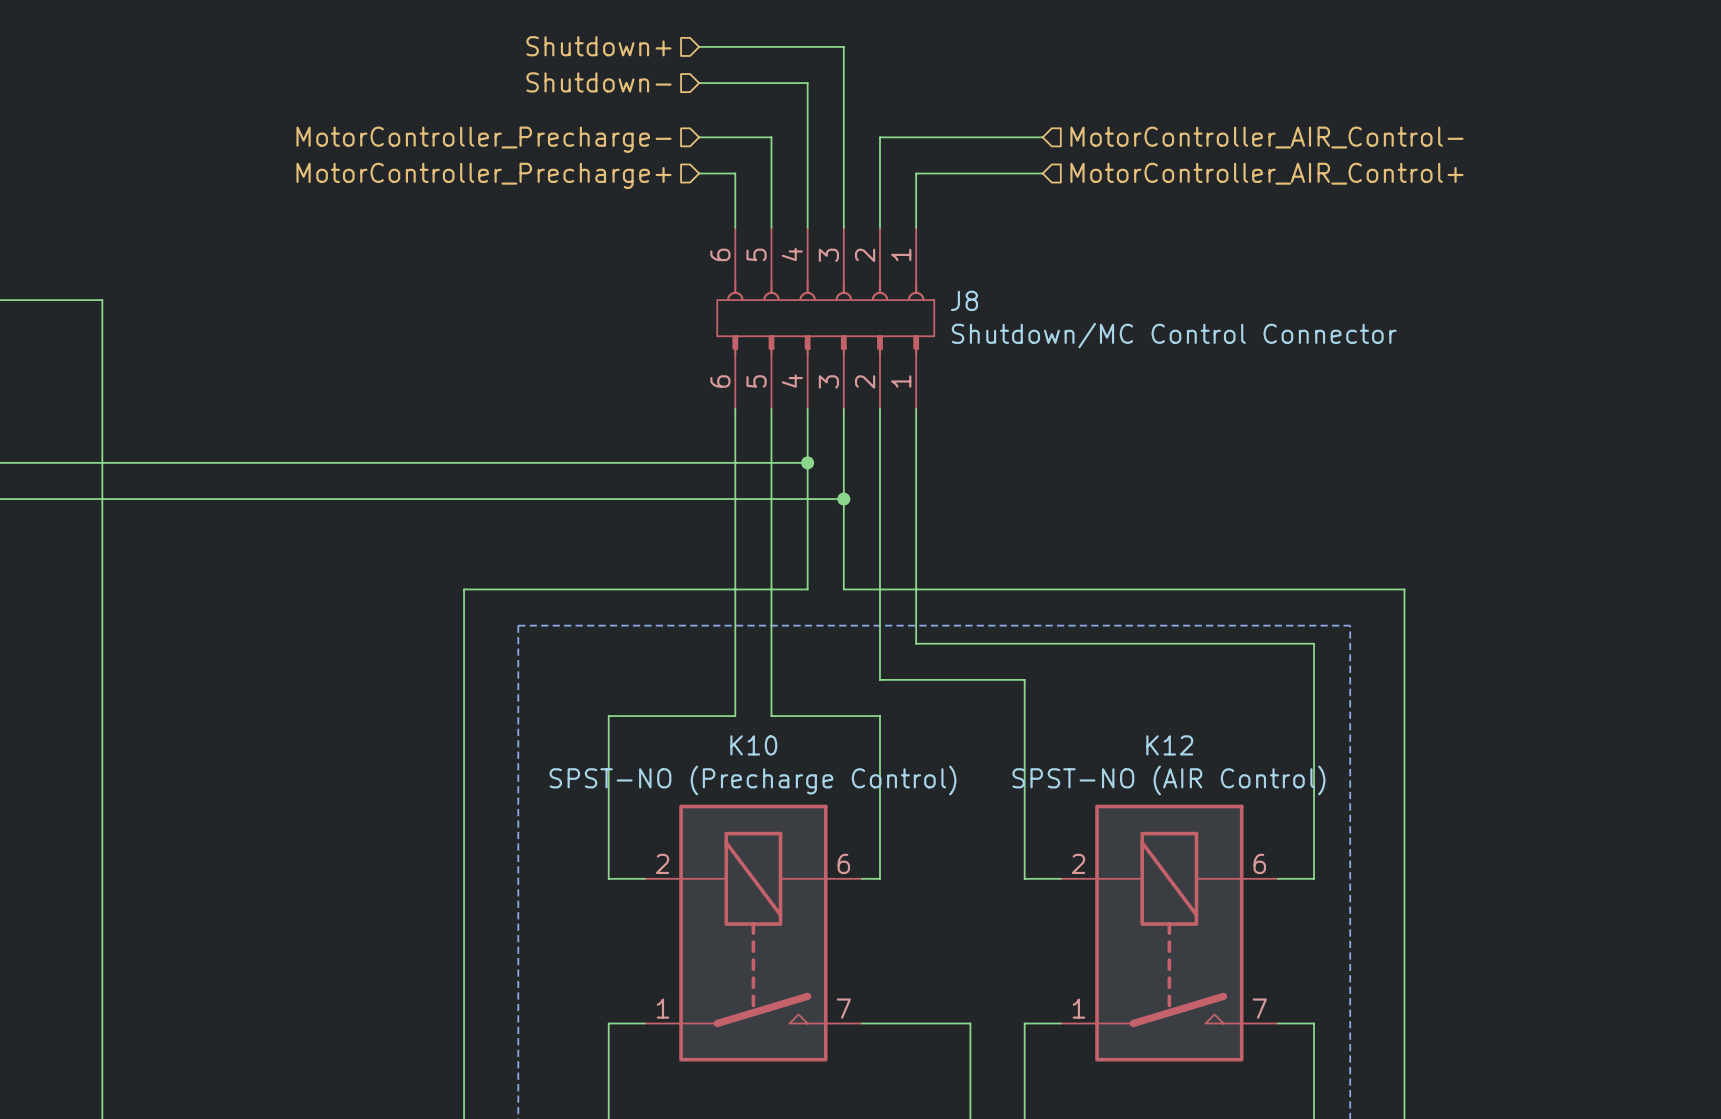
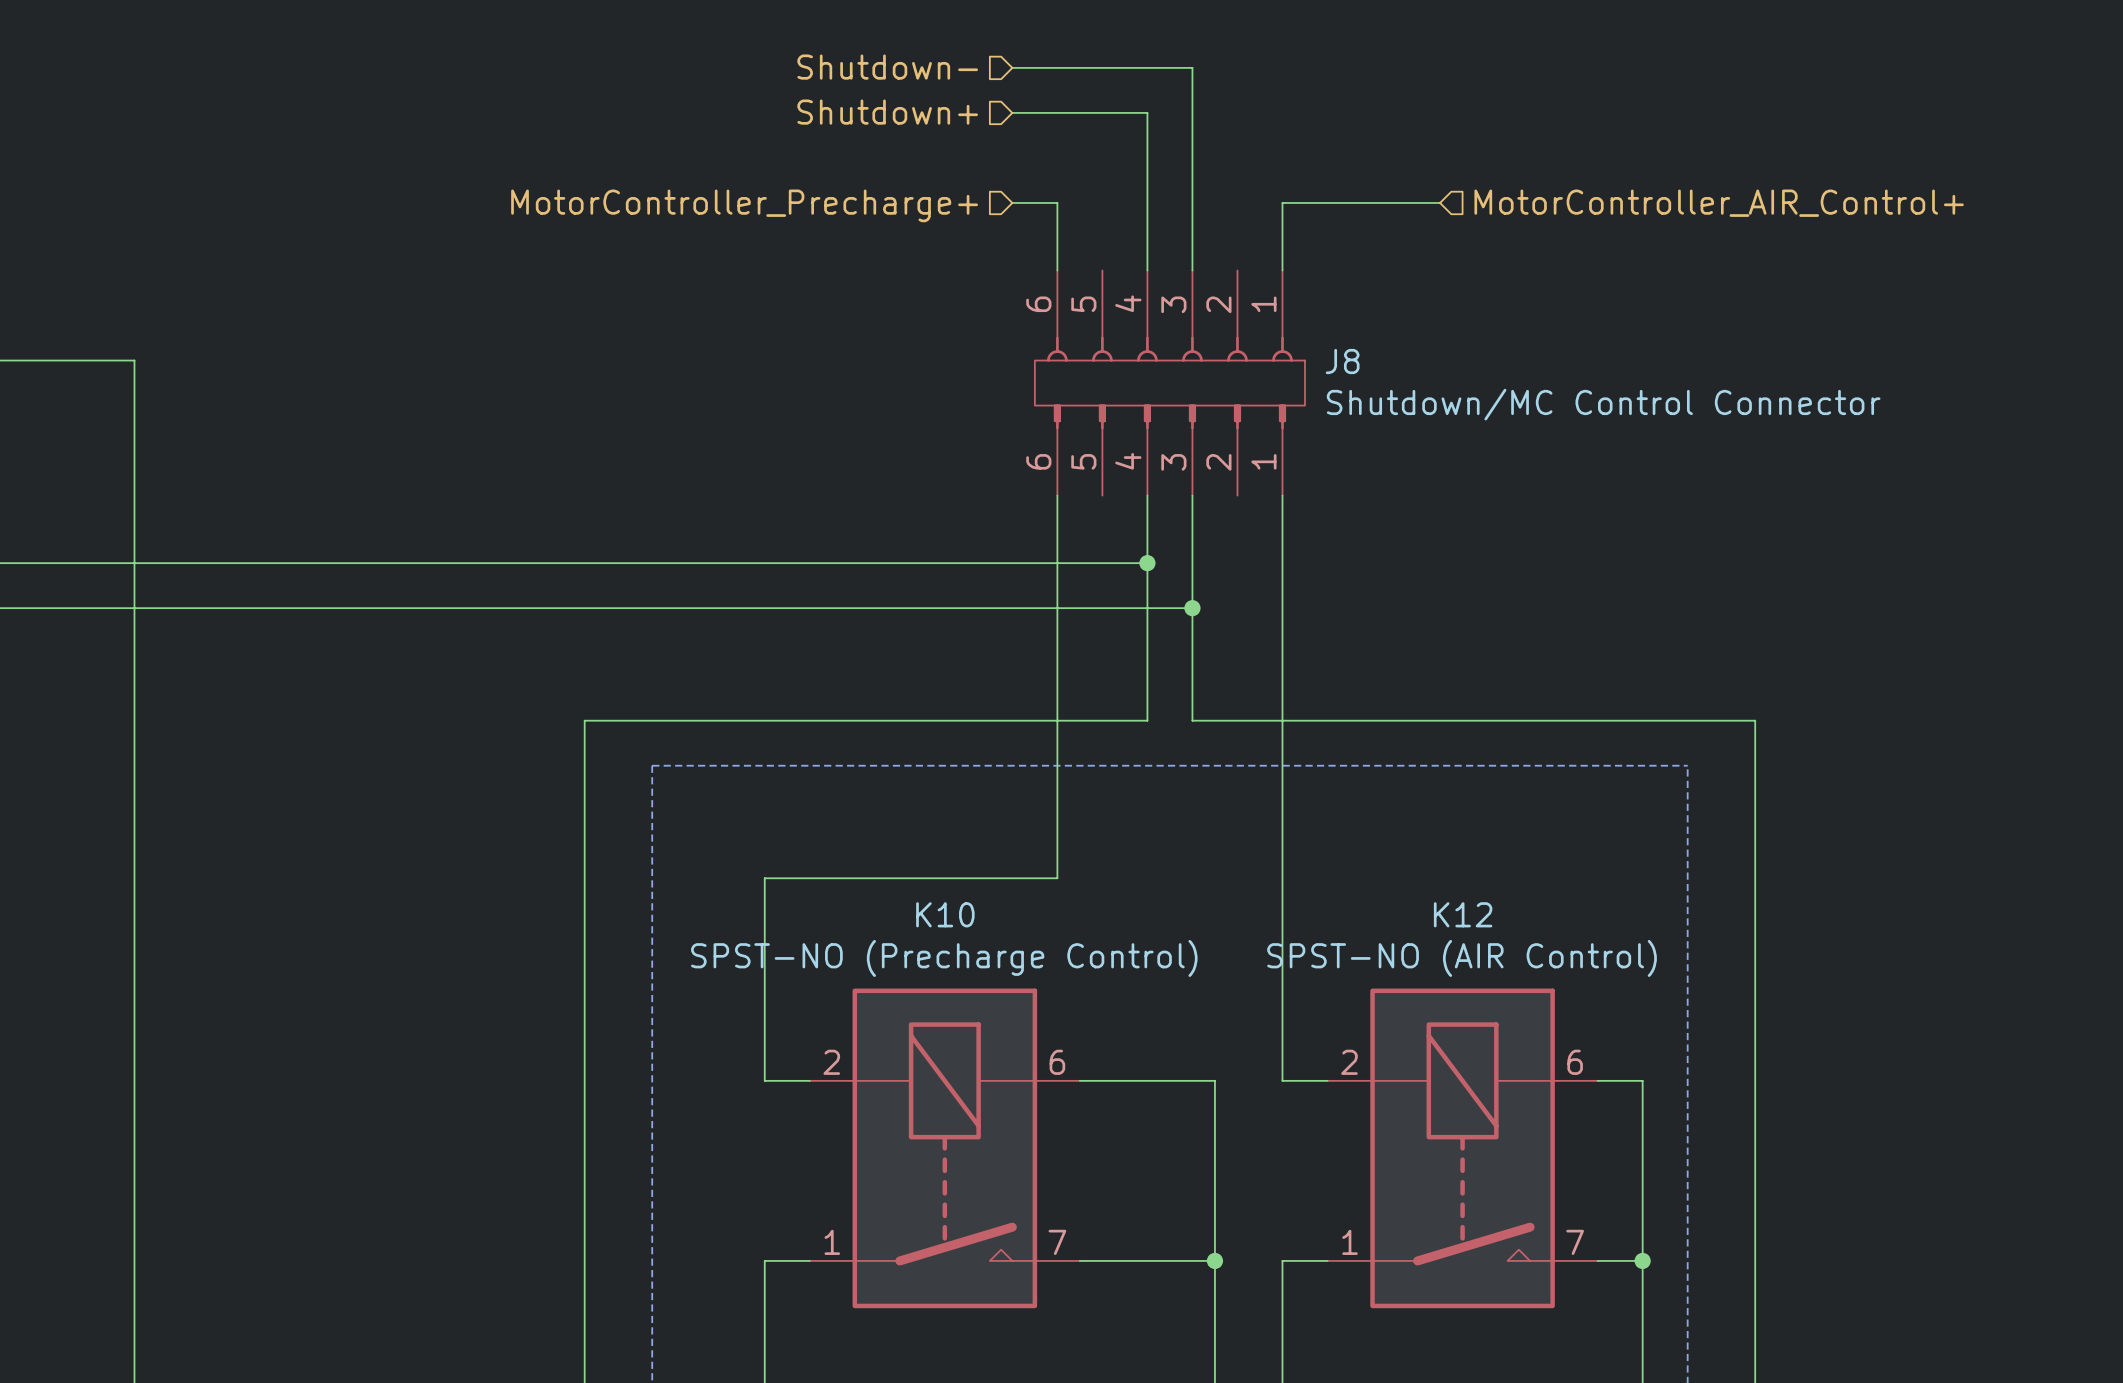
hierarchical label position: Shutdown+ (598, 46) -> Shutdown+ (887, 112)
wire: (699, 46) (843, 46) (843, 173) -> (1012, 202) (1057, 202)
wire: none -> (1012, 67) (1192, 67) (1192, 270)
hierarchical label position: Shutdown- (598, 82) -> Shutdown- (887, 67)
wire: (699, 83) (807, 83) (807, 227) -> none
wire: none -> (1012, 112) (1147, 112) (1147, 202)
wire: (699, 137) (771, 137) (771, 227) -> none
wire: (1042, 137) (879, 137) (879, 227) -> none
hierarchical label: MotorController_AIR_Control- (1266, 137) -> none
hierarchical label: MotorController_Precharge- (483, 139) -> none
wire: (699, 173) (735, 173) (735, 227) -> none
wire: (916, 173) (1024, 173) -> (1282, 270) (1282, 202)
wire: none -> (1305, 202) (1440, 202)
hierarchical label position: MotorController_AIR_Control+ (1266, 173) -> MotorController_AIR_Control+ (1719, 203)
hierarchical label position: MotorController_Precharge+ (483, 175) -> MotorController_Precharge+ (744, 205)
J8 position: (825, 318) -> (1169, 383)
wire: (735, 408) (735, 716) -> (967, 878) (922, 878)
wire: (771, 408) (771, 716) -> none
wire: (807, 408) (807, 589) -> (1192, 495) (1192, 720)
wire: (879, 408) (879, 679) (1024, 679) -> (1282, 495) (1282, 833)
wire: none -> (1012, 563) (1147, 563)
junction: (807, 462) -> none
junction: none -> (1147, 563)
wire: none -> (1057, 608) (1192, 608)
junction: (843, 499) -> none
junction: none -> (1192, 608)
wire: (952, 589) (916, 589) (916, 643) (1314, 643) (1314, 878) -> (1642, 1260) (1642, 1080)
wire: (843, 716) (879, 716) (879, 878) -> (1057, 878) (1057, 720) (1012, 720)
wire: none -> (1102, 1080) (1214, 1080) (1214, 1260)
junction: none -> (1214, 1260)
junction: none -> (1642, 1260)

